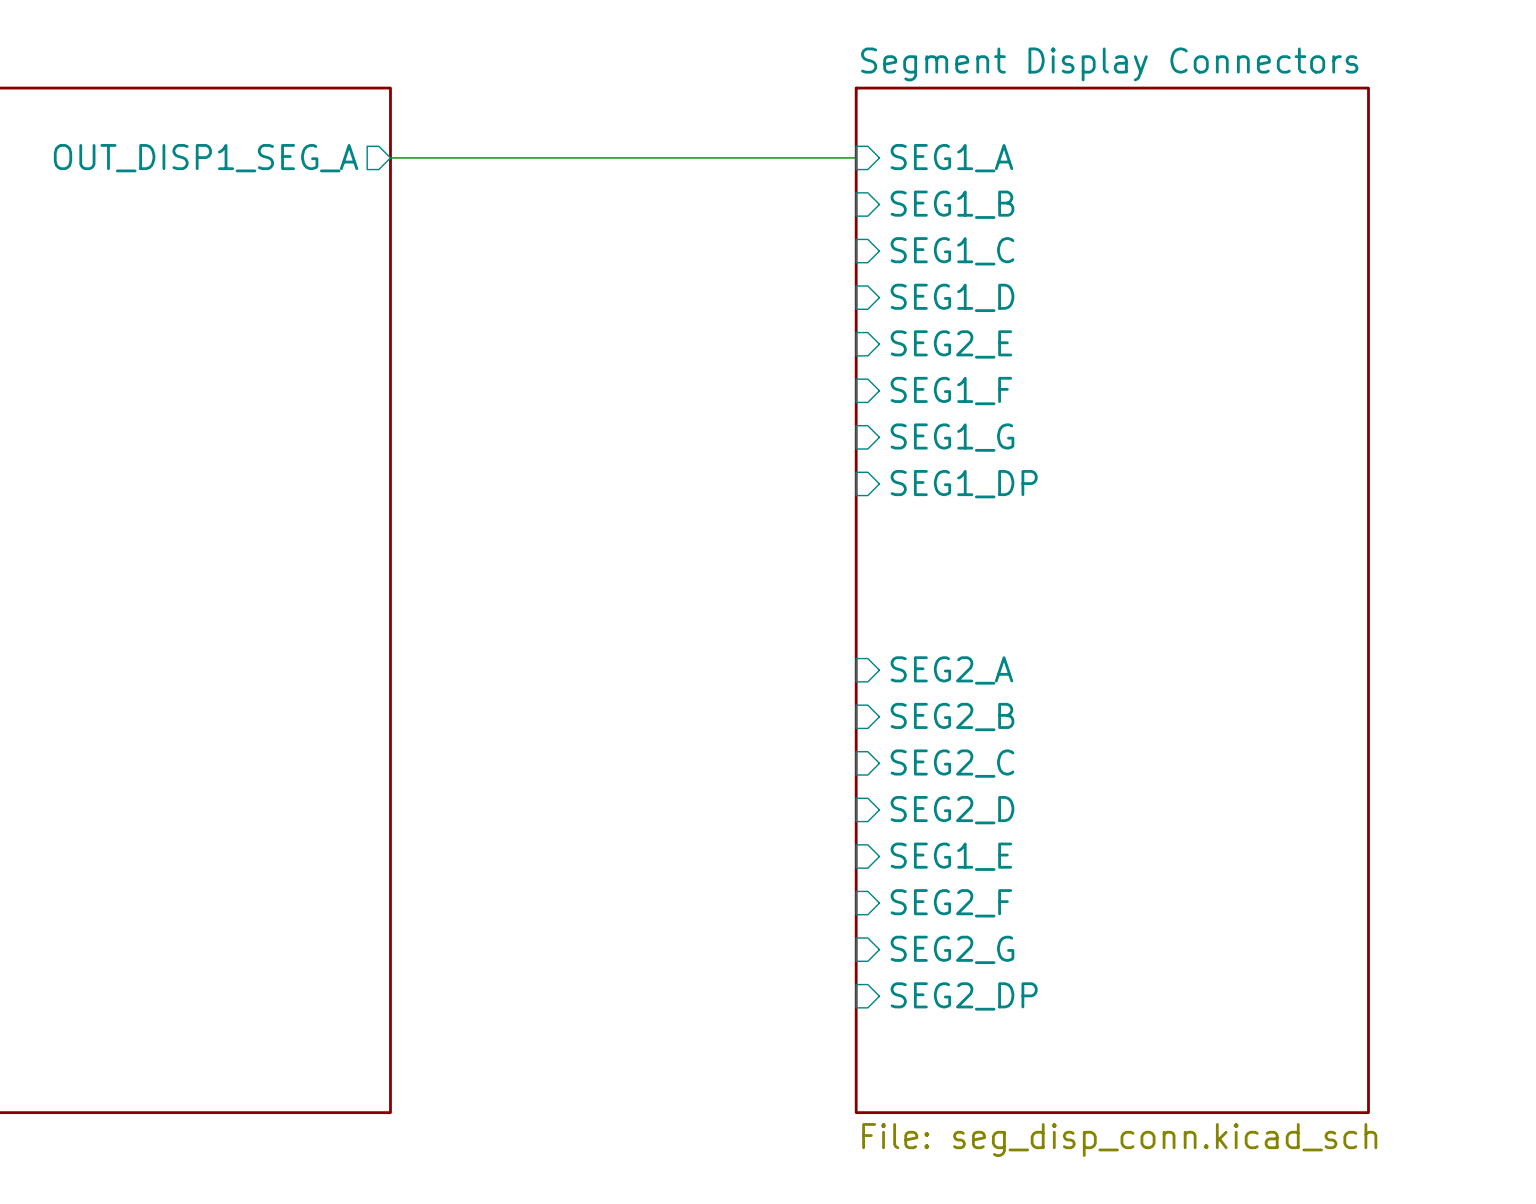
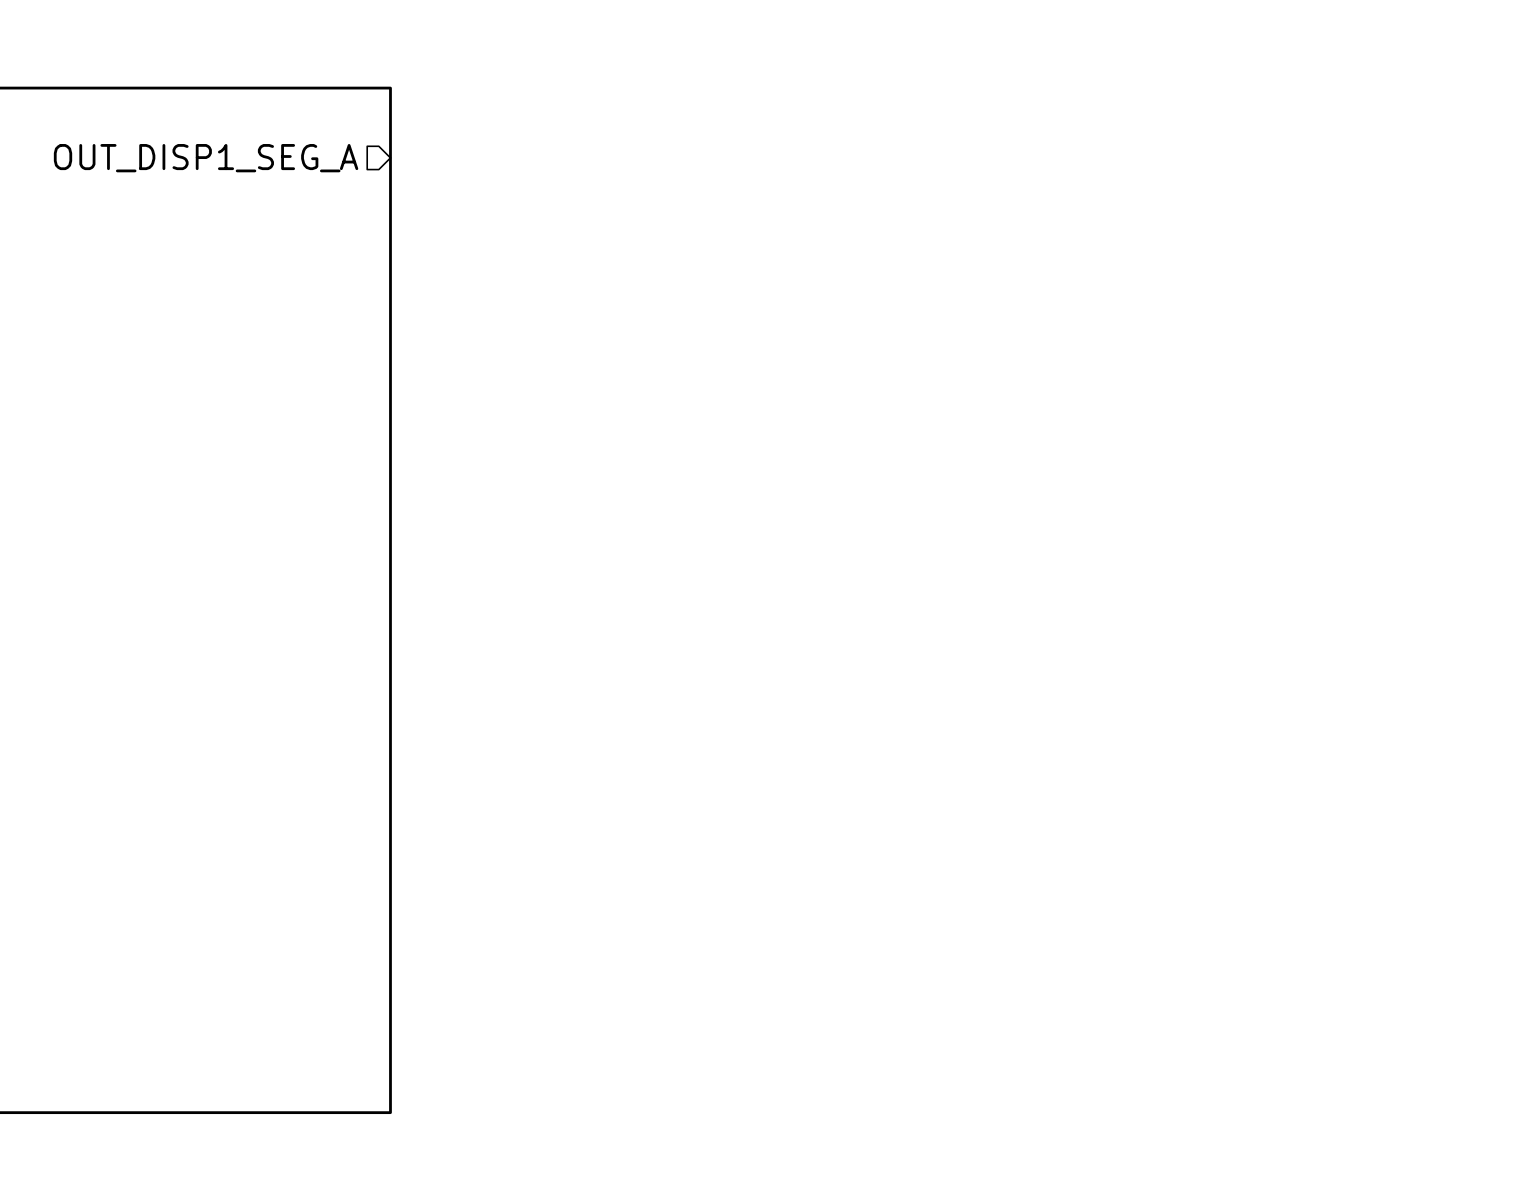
wire: (390, 157) (856, 157) -> none
sheet pin: SEG1_A (951, 158) -> none
sheet pin: SEG1_B (952, 204) -> none
sheet pin: SEG1_C (952, 251) -> none
sheet pin: SEG1_D (952, 297) -> none
sheet pin: SEG2_E (951, 344) -> none
sheet pin: SEG1_F (951, 391) -> none
sheet pin: SEG1_G (952, 437) -> none
sheet pin: SEG1_DP (964, 484) -> none
sheet Segment Display Connectors: File: seg_disp_conn.kicad_sch (1112, 600) -> none
sheet pin: SEG2_A (951, 670) -> none
sheet pin: SEG2_B (952, 717) -> none
sheet pin: SEG2_C (952, 763) -> none
sheet pin: SEG2_D (952, 810) -> none
sheet pin: SEG1_E (951, 856) -> none
sheet pin: SEG2_F (951, 903) -> none
sheet pin: SEG2_G (952, 949) -> none
sheet pin: SEG2_DP (964, 996) -> none

